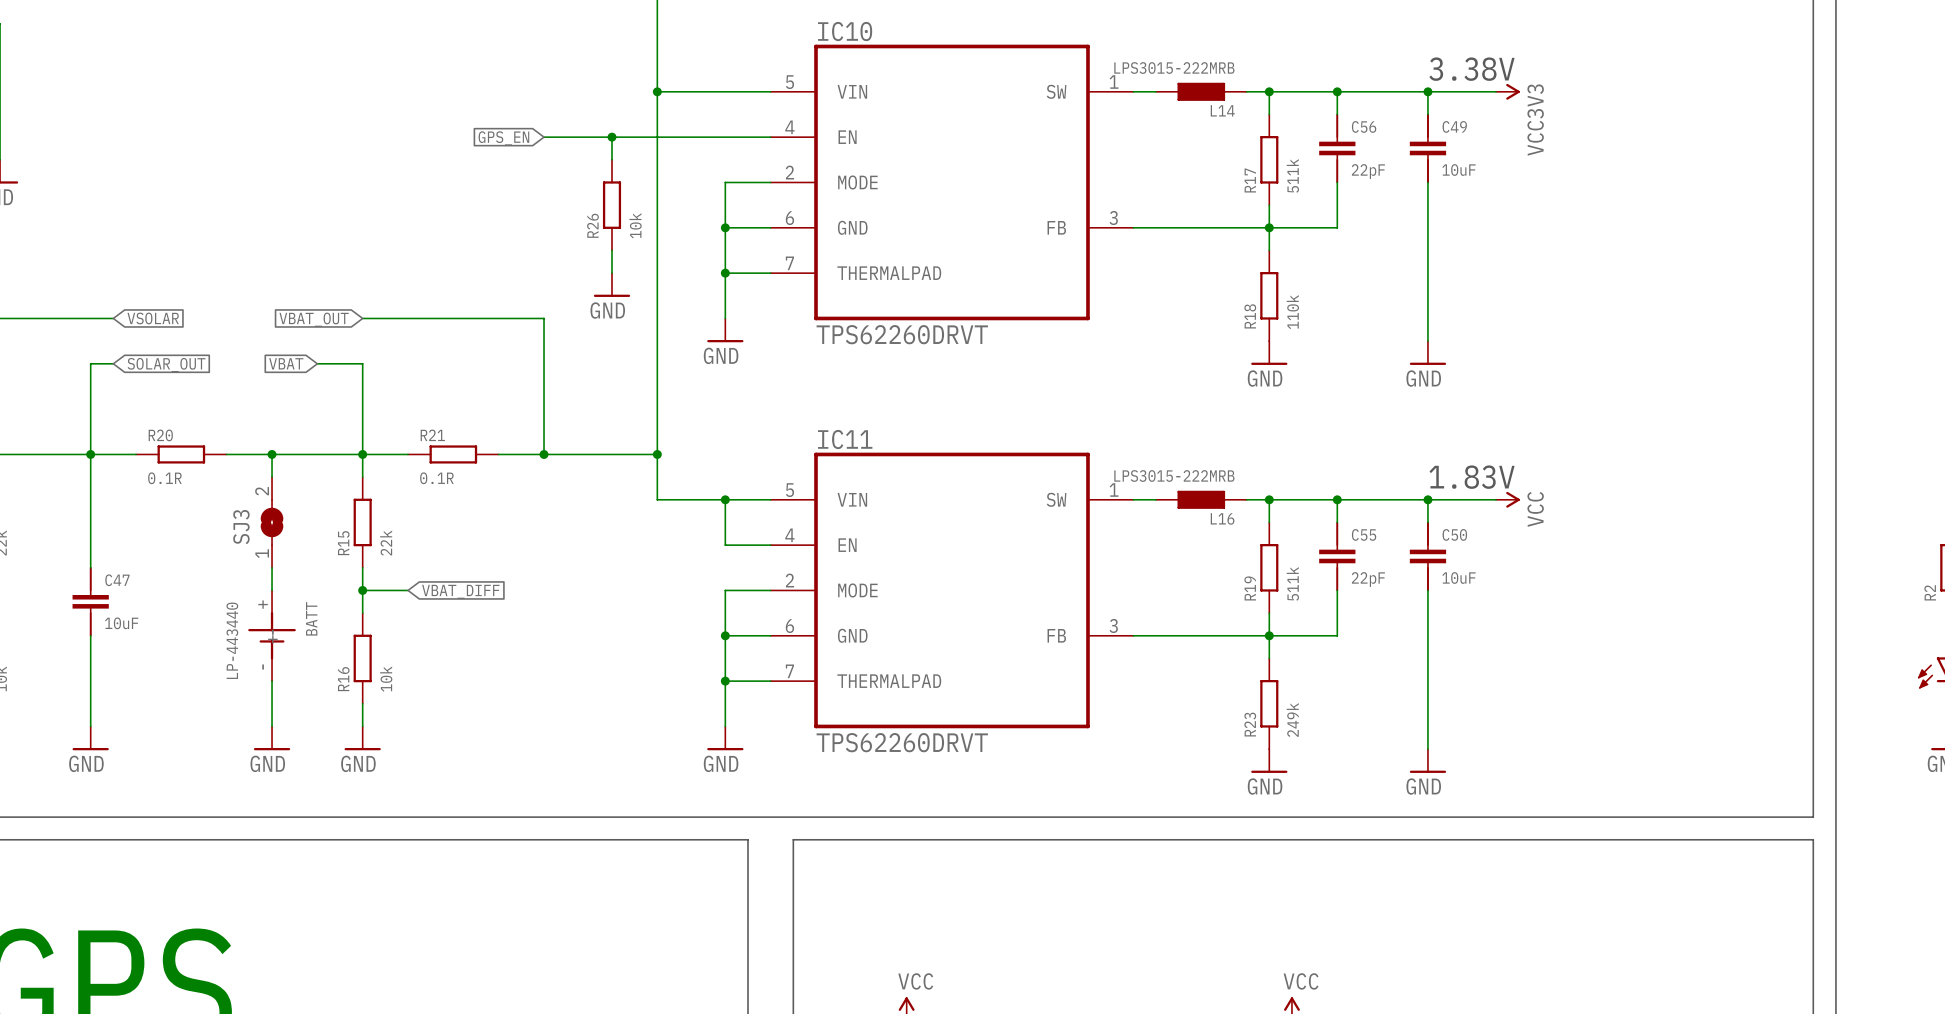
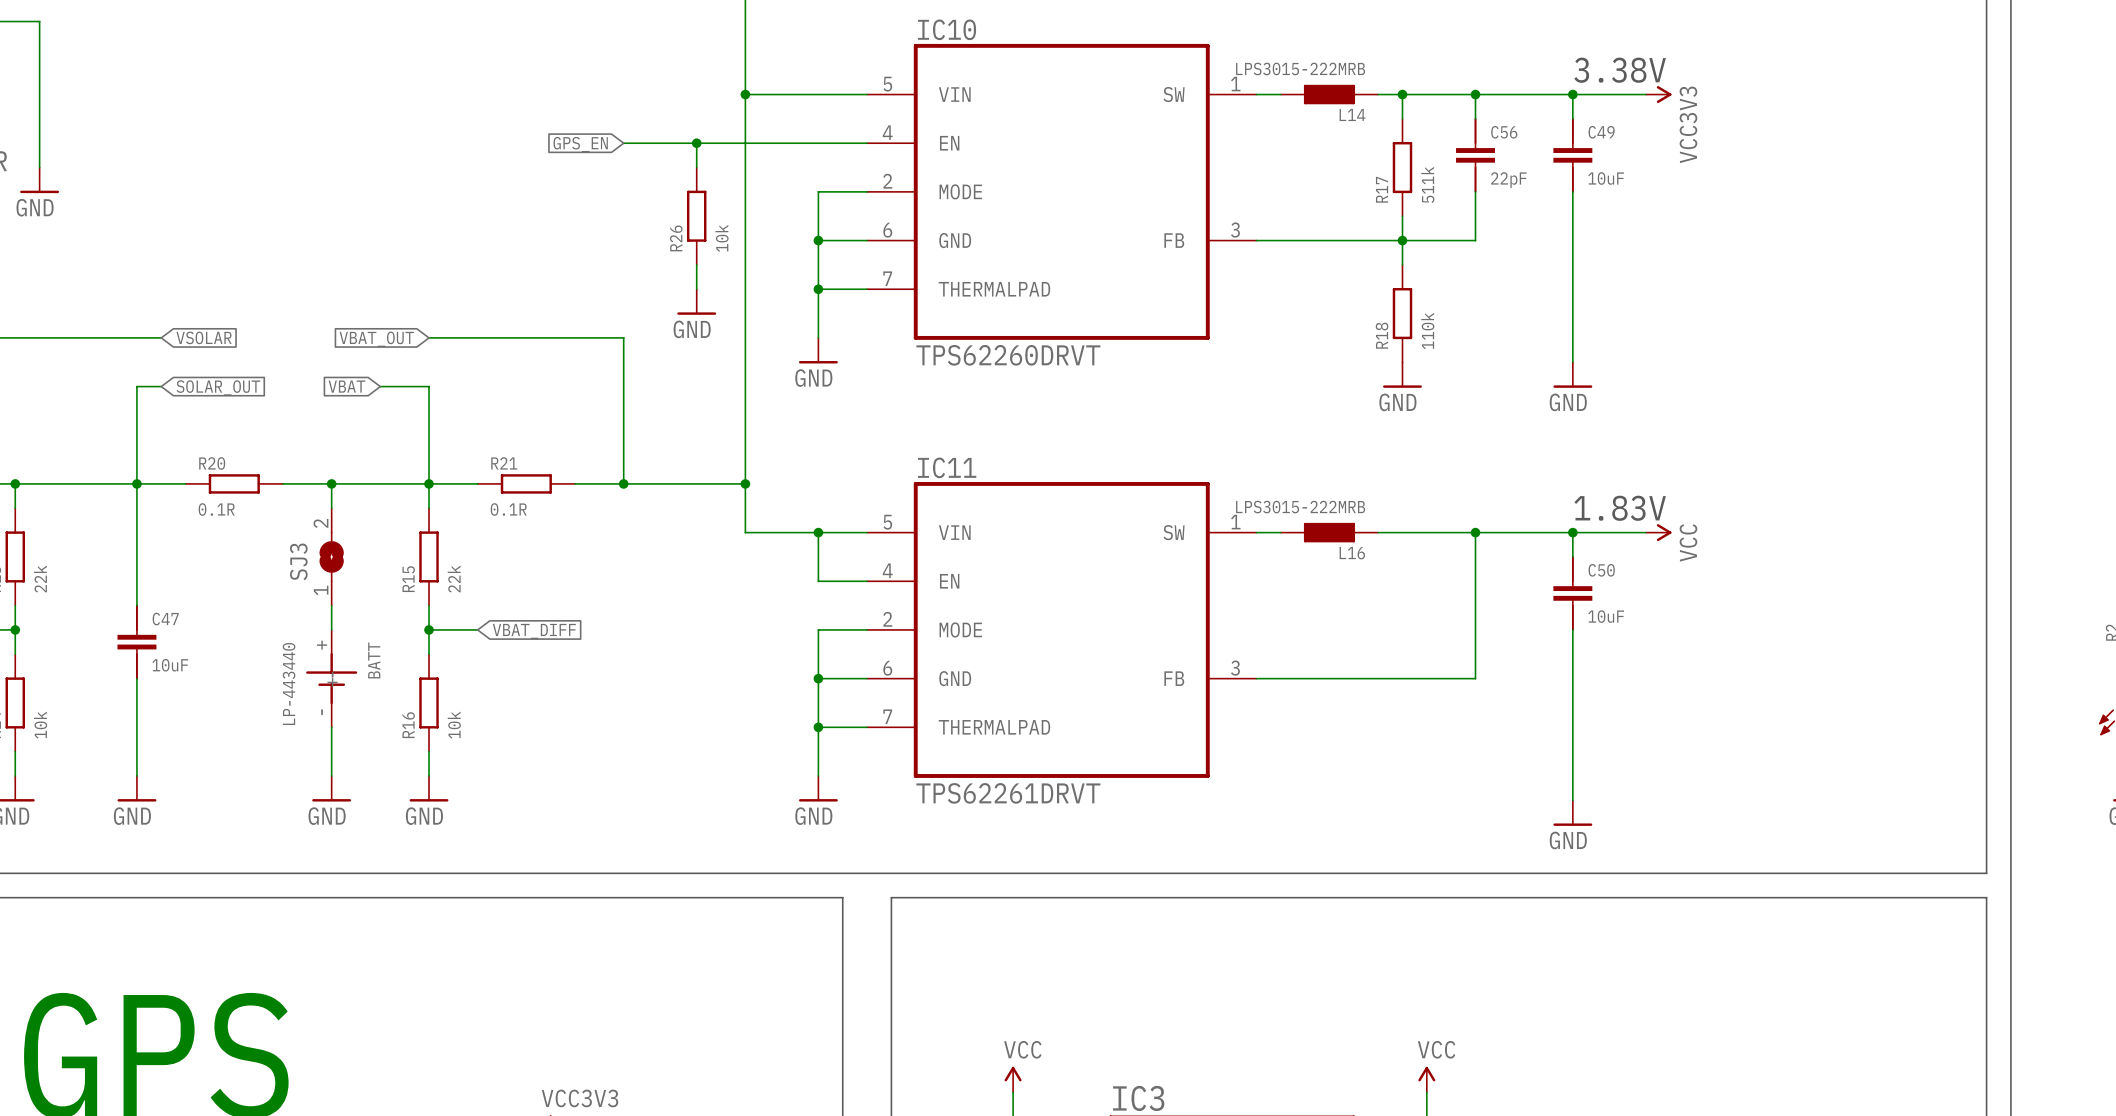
wire: (1269, 499) (1269, 522) -> none
junction: (1269, 499) -> none
C55: 22pF (1337, 556) -> none
R19: 511k (1269, 567) -> none
wire: (1269, 613) (1269, 658) -> none
junction: (1269, 635) -> none
R23: 249k (1269, 703) -> none
IC11 value: TPS62260DRVT (902, 742) -> TPS62261DRVT (1008, 793)
power symbol: GND (1269, 761) -> none

